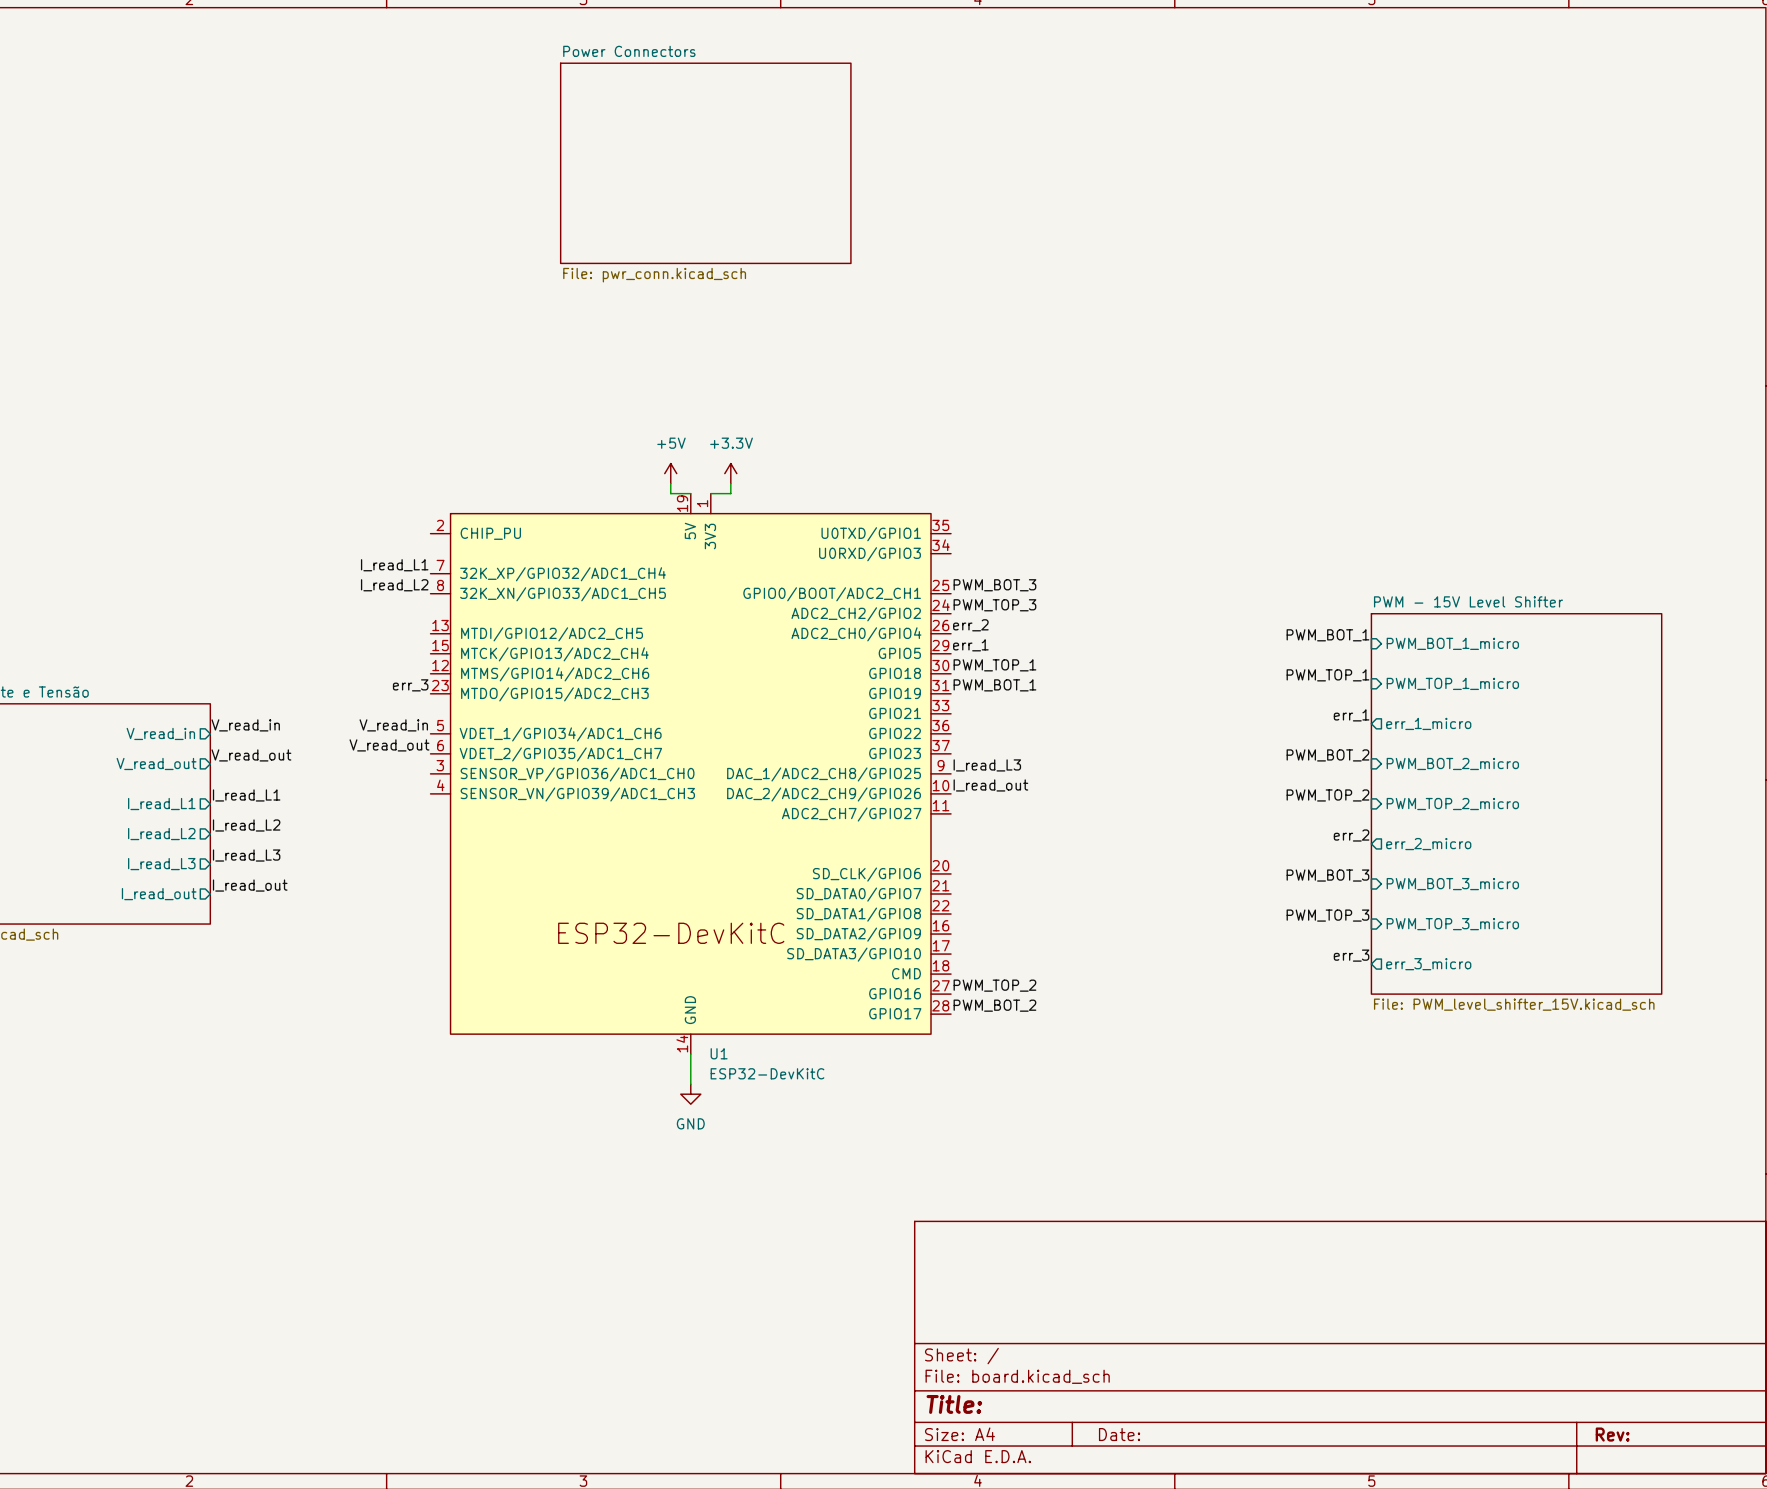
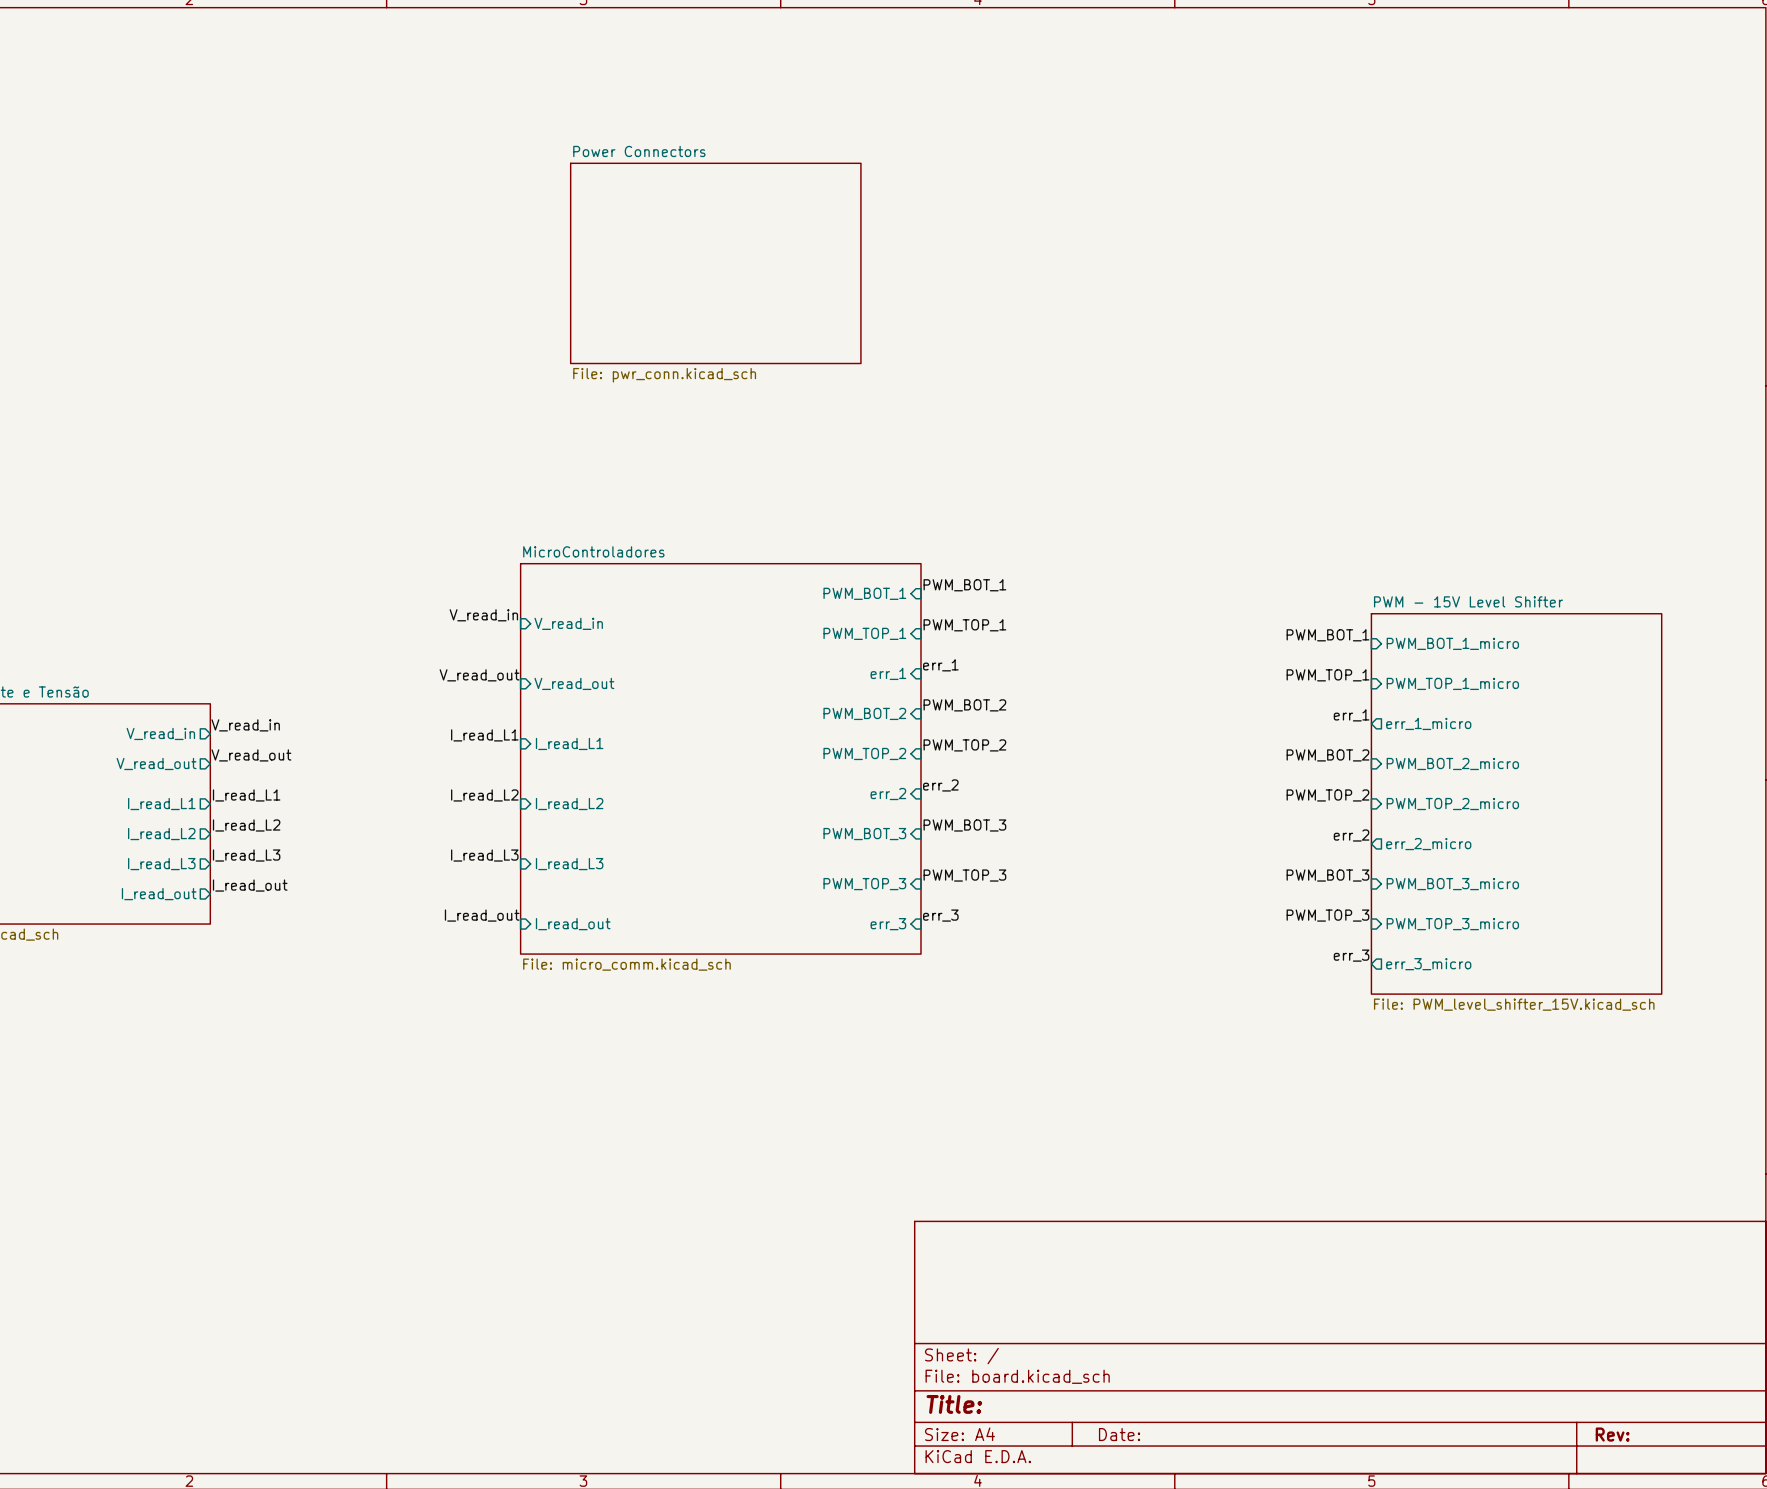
sheet Power Connectors position: (705, 163) -> (715, 263)
power symbol: +5V (670, 473) -> none
power symbol: +3.3V (730, 473) -> none
wire: (670, 483) (670, 493) (690, 493) -> none
wire: (730, 483) (730, 493) (710, 493) -> none
label position: I_read_L1 (394, 565) -> I_read_L1 (484, 735)
label: I_read_L2 (394, 585) -> none
label: PWM_BOT_3 (994, 585) -> none
sheet pin: none -> PWM_BOT_1 (864, 593)
label: PWM_TOP_3 (994, 605) -> none
sheet pin: none -> V_read_in (568, 623)
label position: err_2 (970, 625) -> err_2 (940, 785)
sheet pin: none -> PWM_TOP_1 (864, 633)
label position: err_1 (970, 645) -> err_1 (940, 665)
label position: PWM_TOP_1 (994, 665) -> PWM_TOP_1 (964, 625)
sheet pin: none -> err_1 (888, 673)
sheet pin: none -> V_read_out (574, 683)
label: err_3 (410, 685) -> none
label position: PWM_BOT_1 (994, 685) -> PWM_BOT_1 (964, 585)
label: none -> PWM_BOT_2 (964, 705)
sheet pin: none -> PWM_BOT_2 (864, 713)
label position: V_read_in (393, 725) -> V_read_in (483, 615)
sheet pin: none -> I_read_L1 (569, 743)
label position: V_read_out (389, 745) -> V_read_out (479, 675)
label: none -> PWM_TOP_2 (964, 745)
sheet pin: none -> PWM_TOP_2 (864, 753)
sheet MicroControladores: none -> File: micro_comm.kicad_sch (720, 758)
label: I_read_L3 (987, 765) -> none
U1: ESP32-DevKitC (690, 773) -> none
label: I_read_out (990, 785) -> none
sheet pin: none -> err_2 (888, 794)
label: none -> I_read_L2 (484, 795)
sheet pin: none -> I_read_L2 (569, 804)
label: none -> PWM_BOT_3 (964, 825)
sheet pin: none -> PWM_BOT_3 (864, 834)
label: none -> I_read_L3 (484, 855)
sheet pin: none -> I_read_L3 (569, 864)
label: none -> PWM_TOP_3 (964, 875)
sheet pin: none -> PWM_TOP_3 (864, 884)
label: none -> I_read_out (482, 915)
label: none -> err_3 (940, 915)
sheet pin: none -> I_read_out (573, 924)
sheet pin: none -> err_3 (888, 924)
label: PWM_TOP_2 (994, 985) -> none
label: PWM_BOT_2 (994, 1005) -> none
wire: (690, 1054) (690, 1084) -> none
power symbol: GND (690, 1094) -> none

